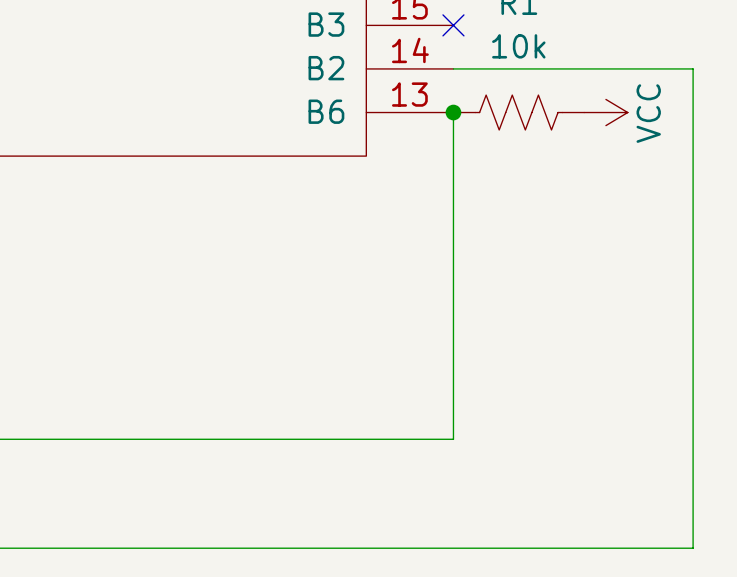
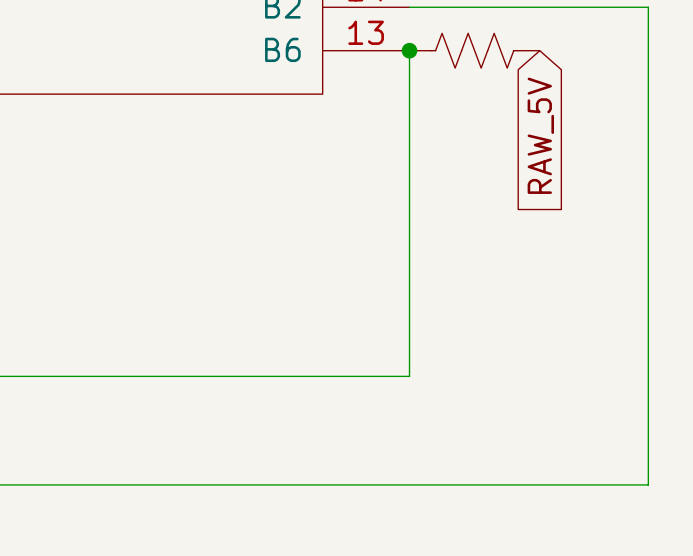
power symbol: VCC (605, 112) -> none
global label: none -> RAW_5V (540, 135)

